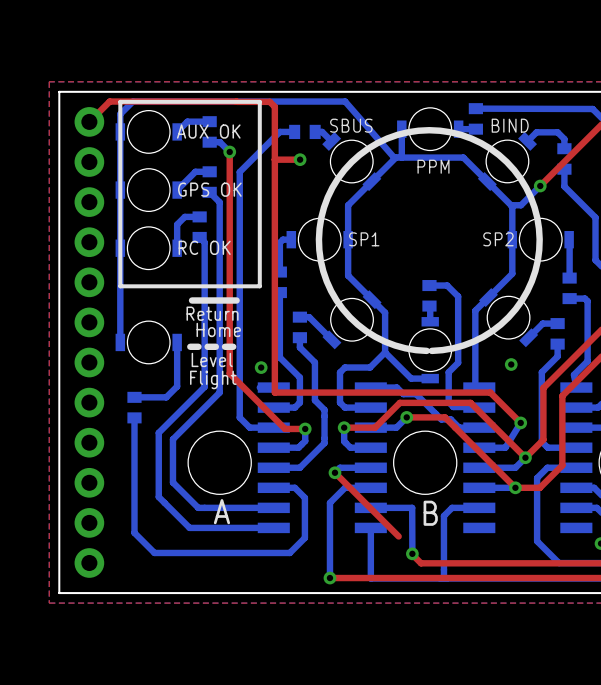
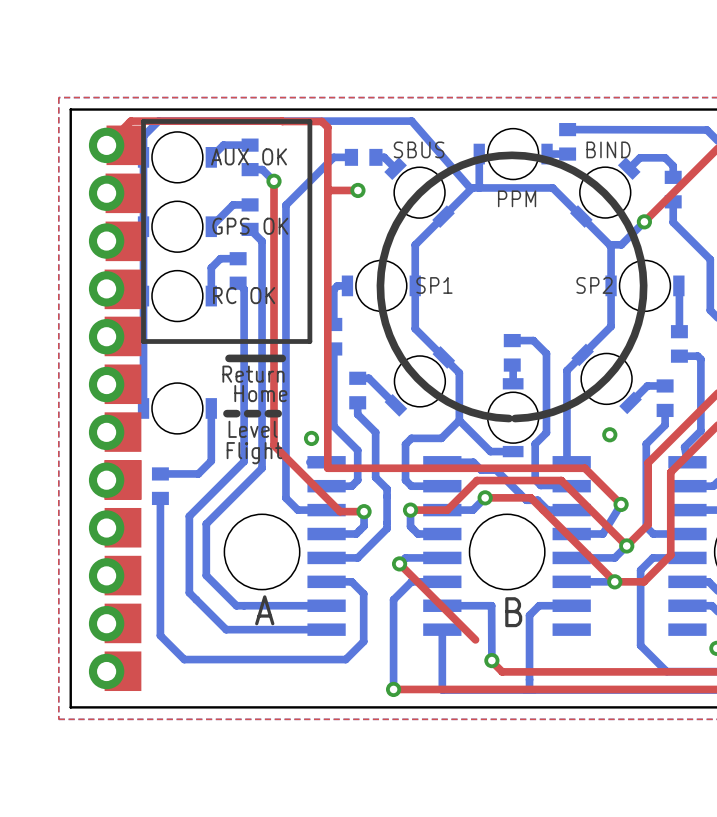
drawing: none -> [104, 125, 144, 692]

